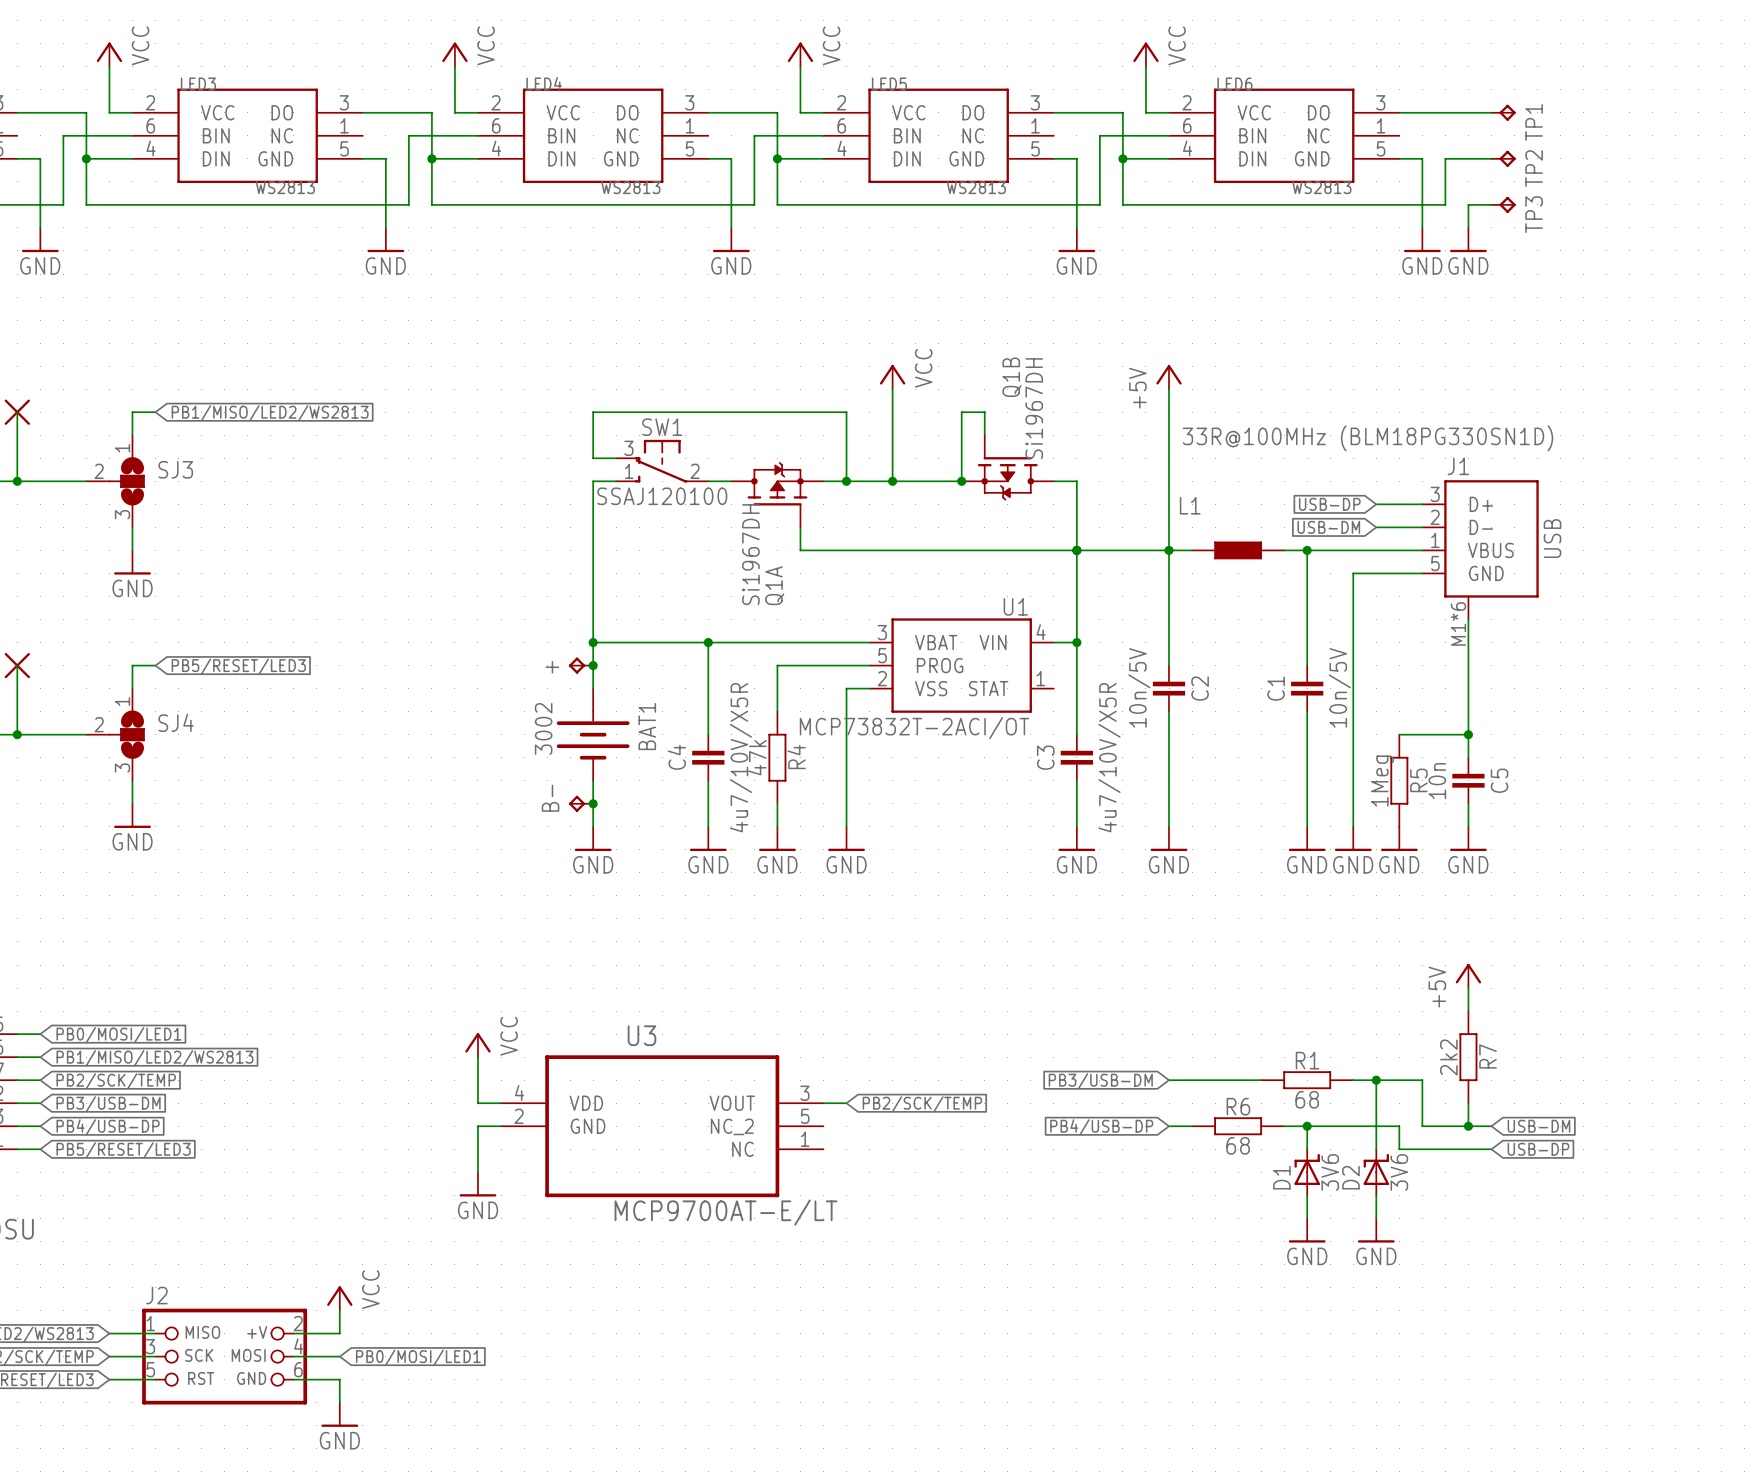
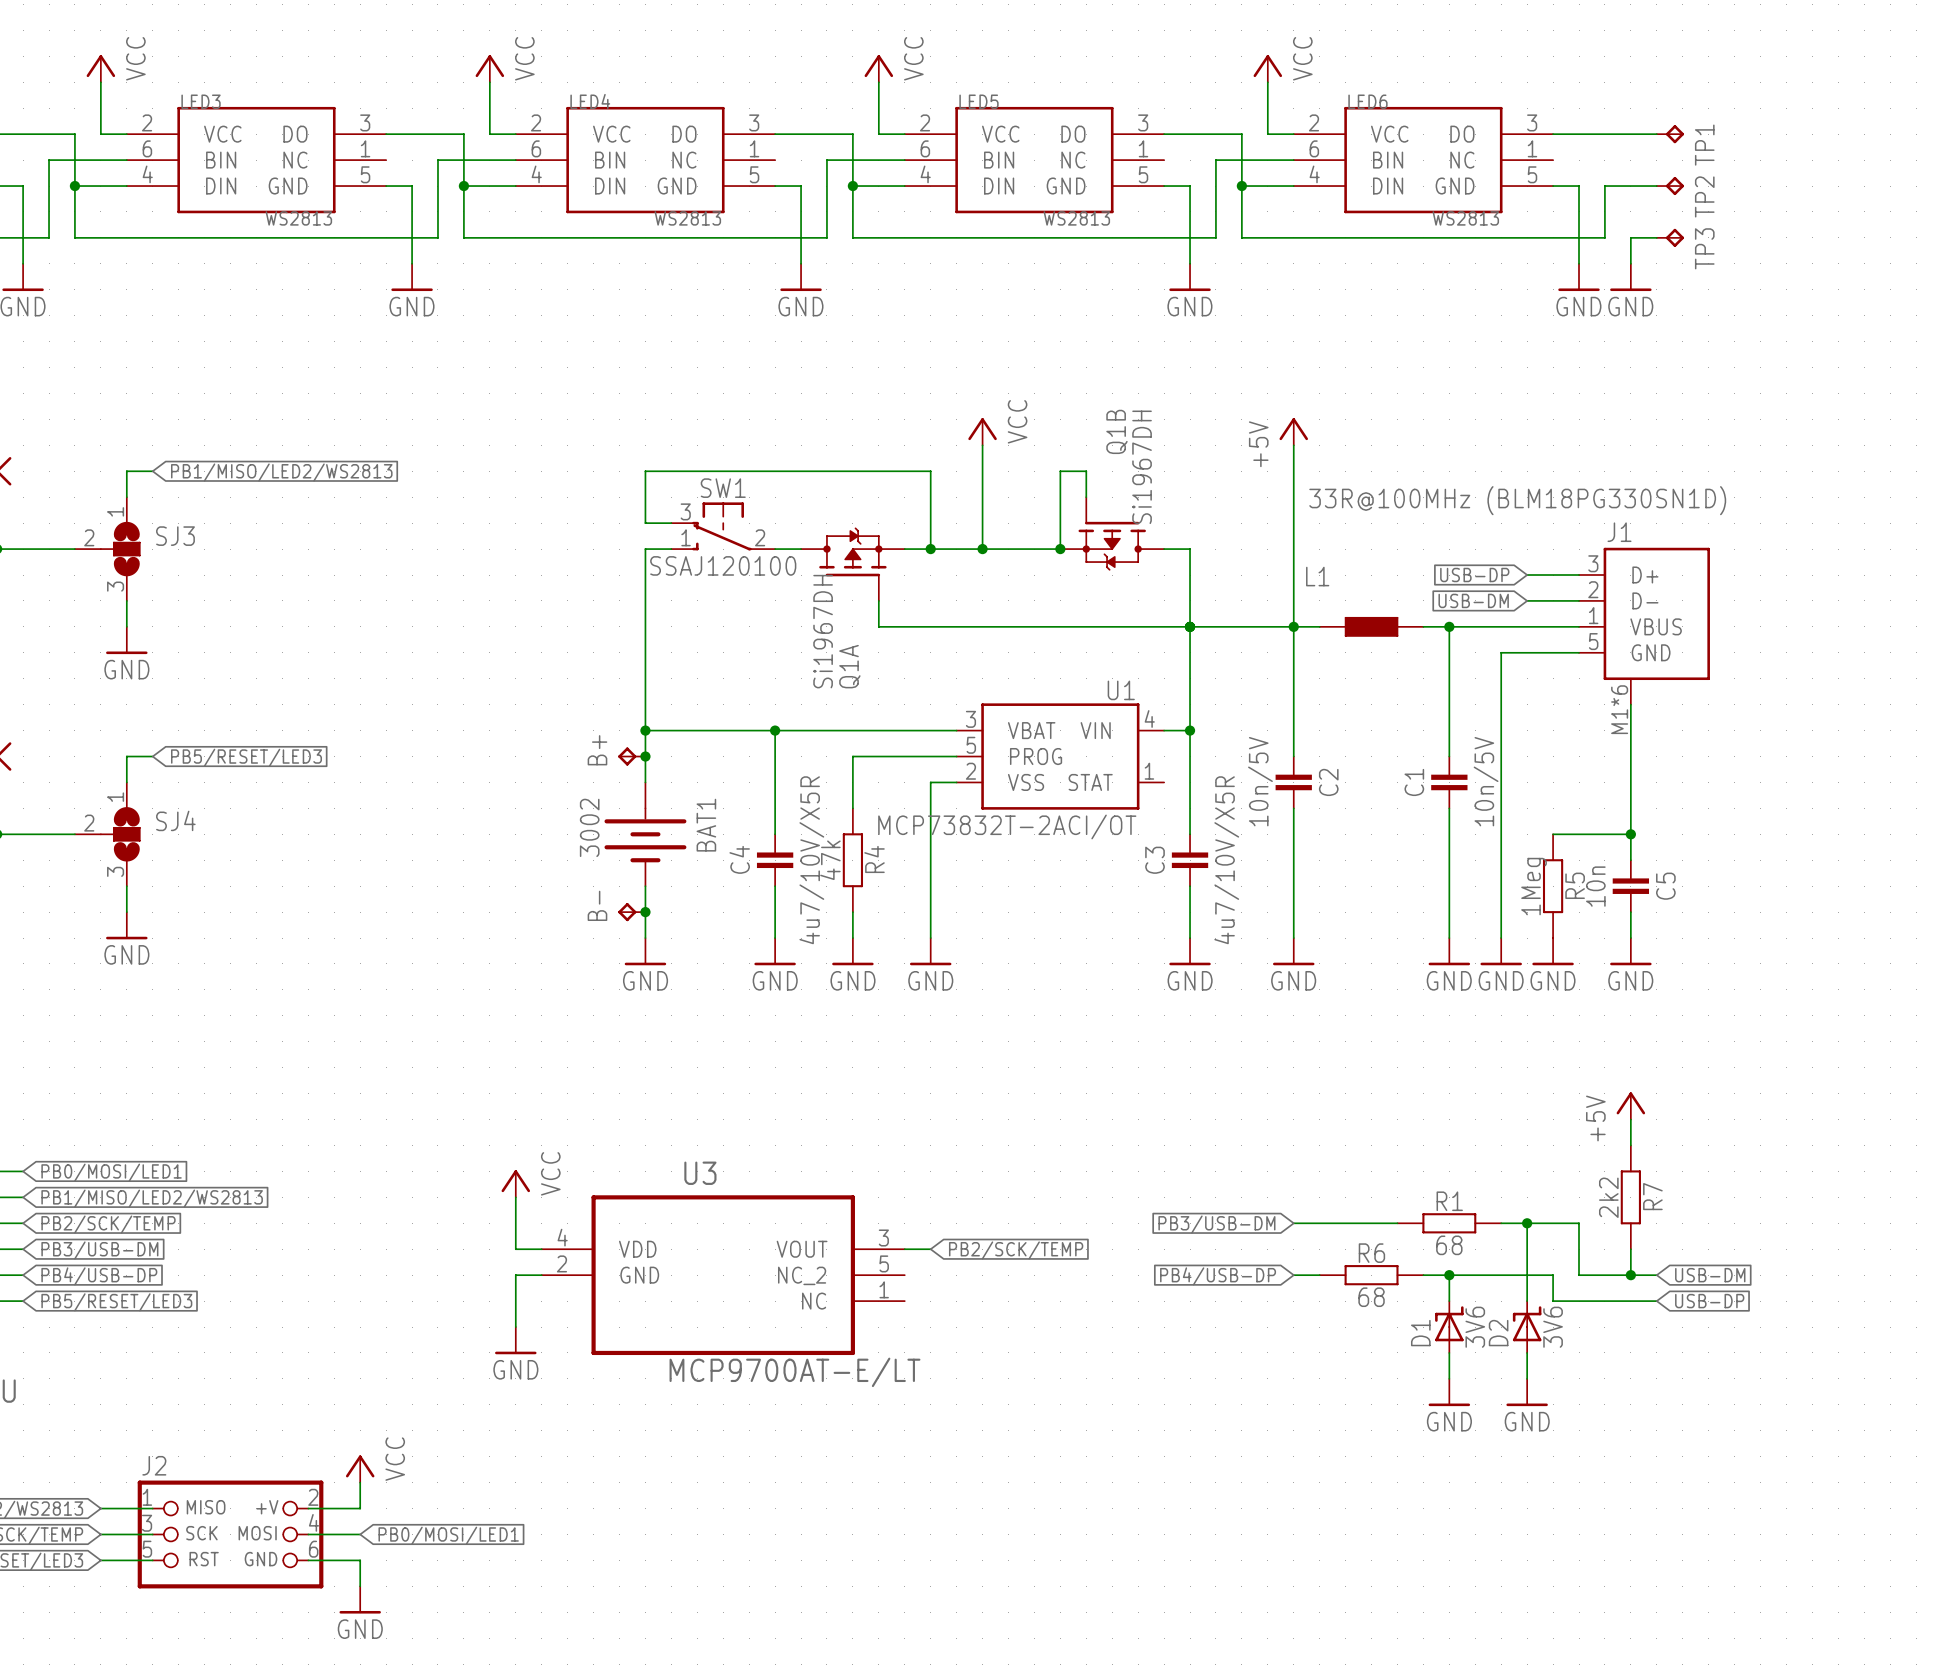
J1 value: USB (1552, 538) -> none
B+ name: + (552, 667) -> B+ (597, 750)

